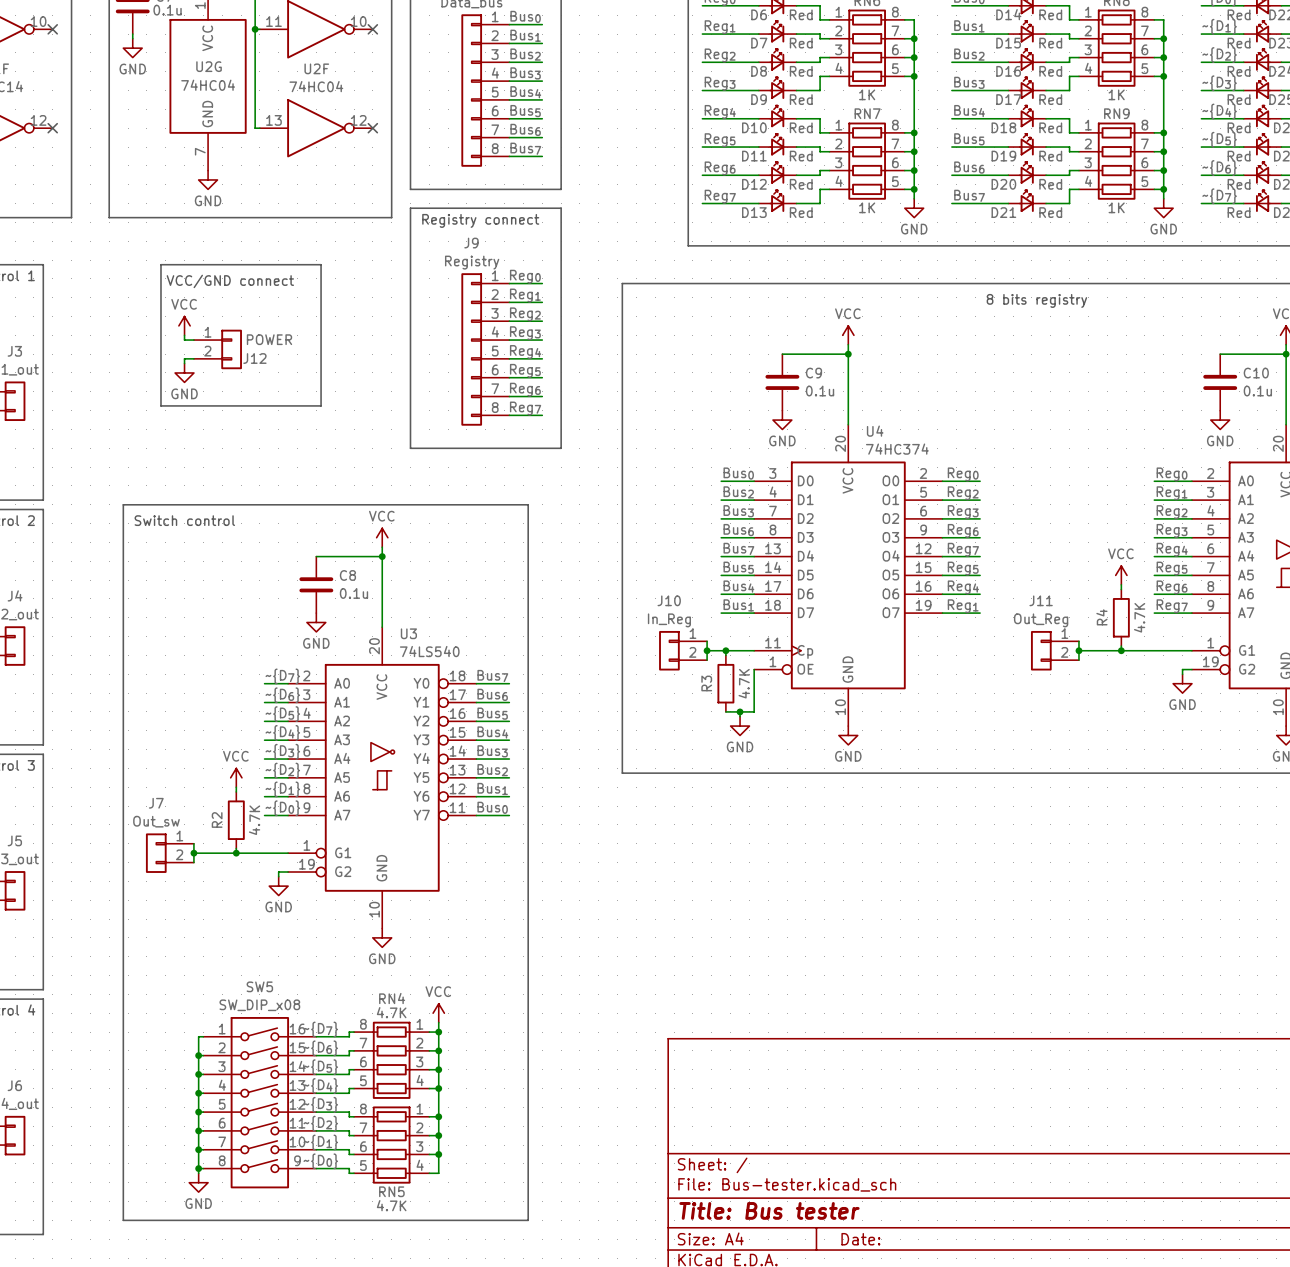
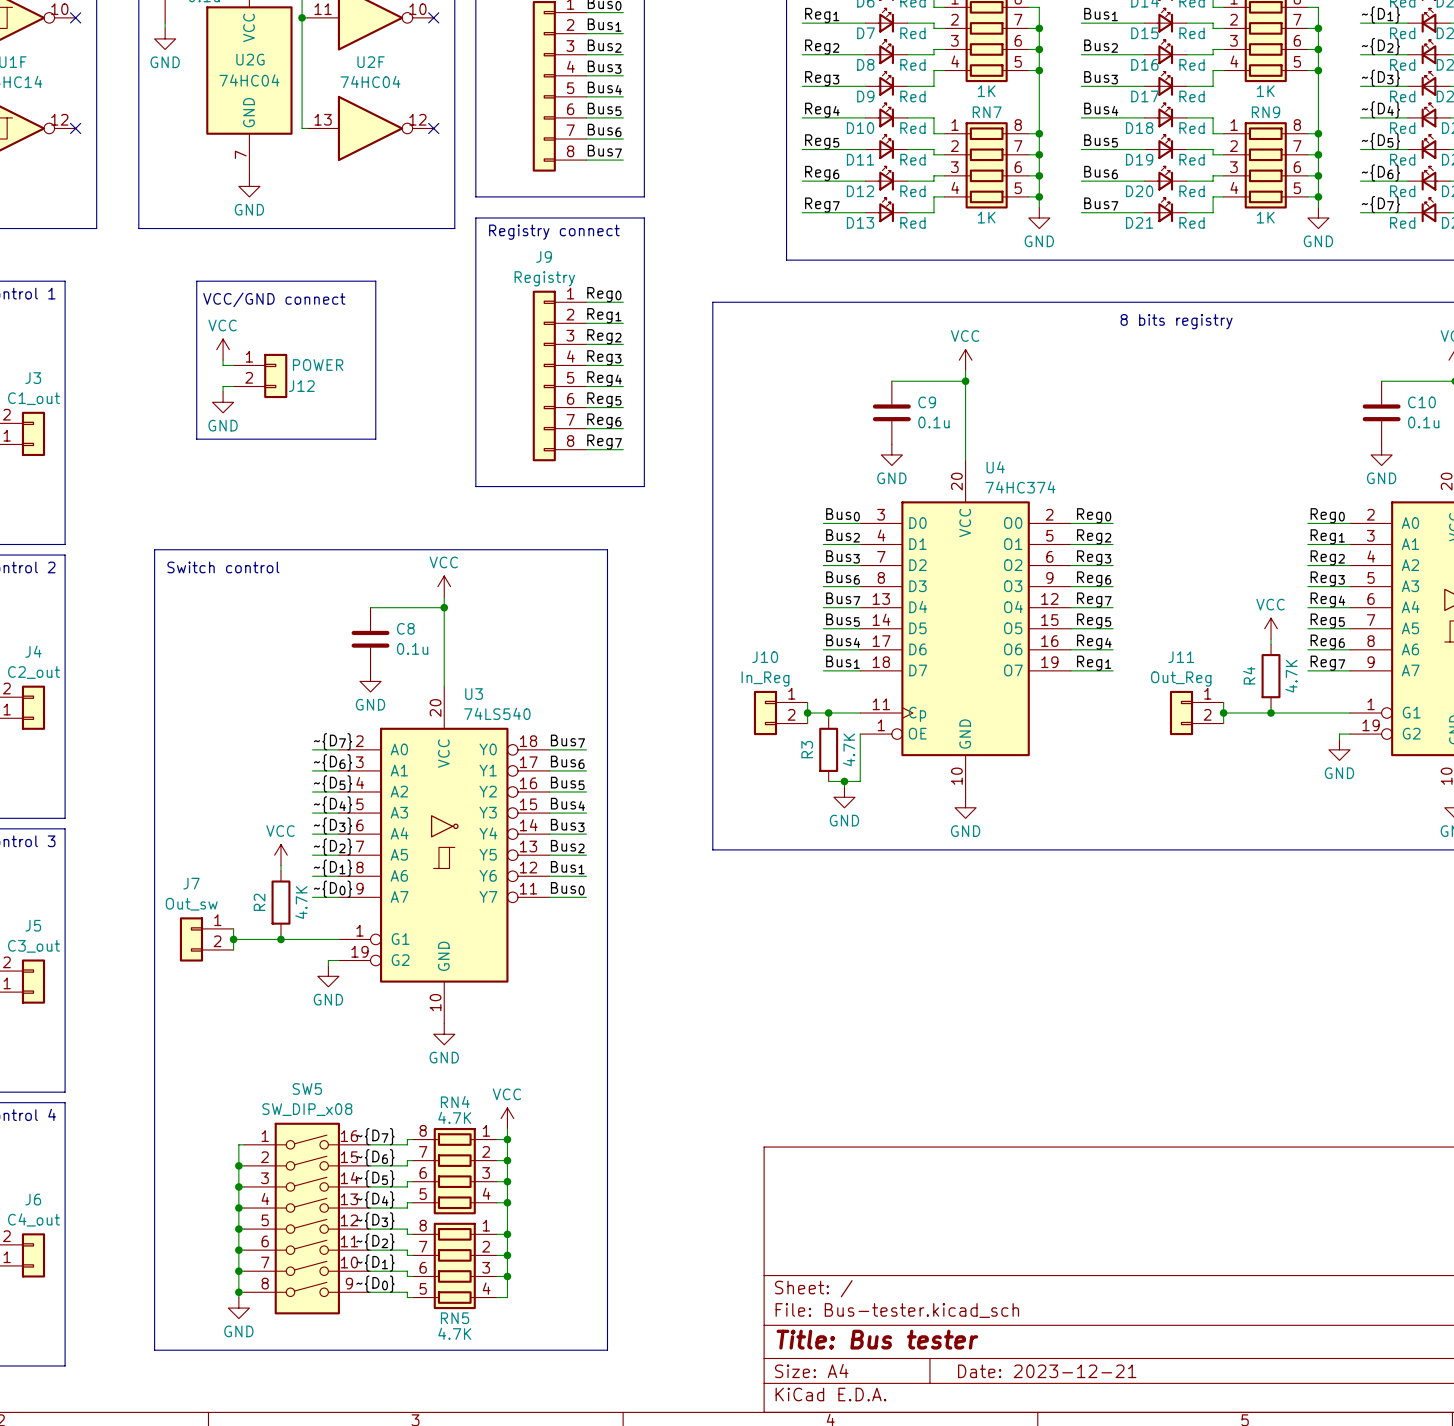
title block: Date: (860, 1239) -> Date: 2023-12-21 (1047, 1371)

